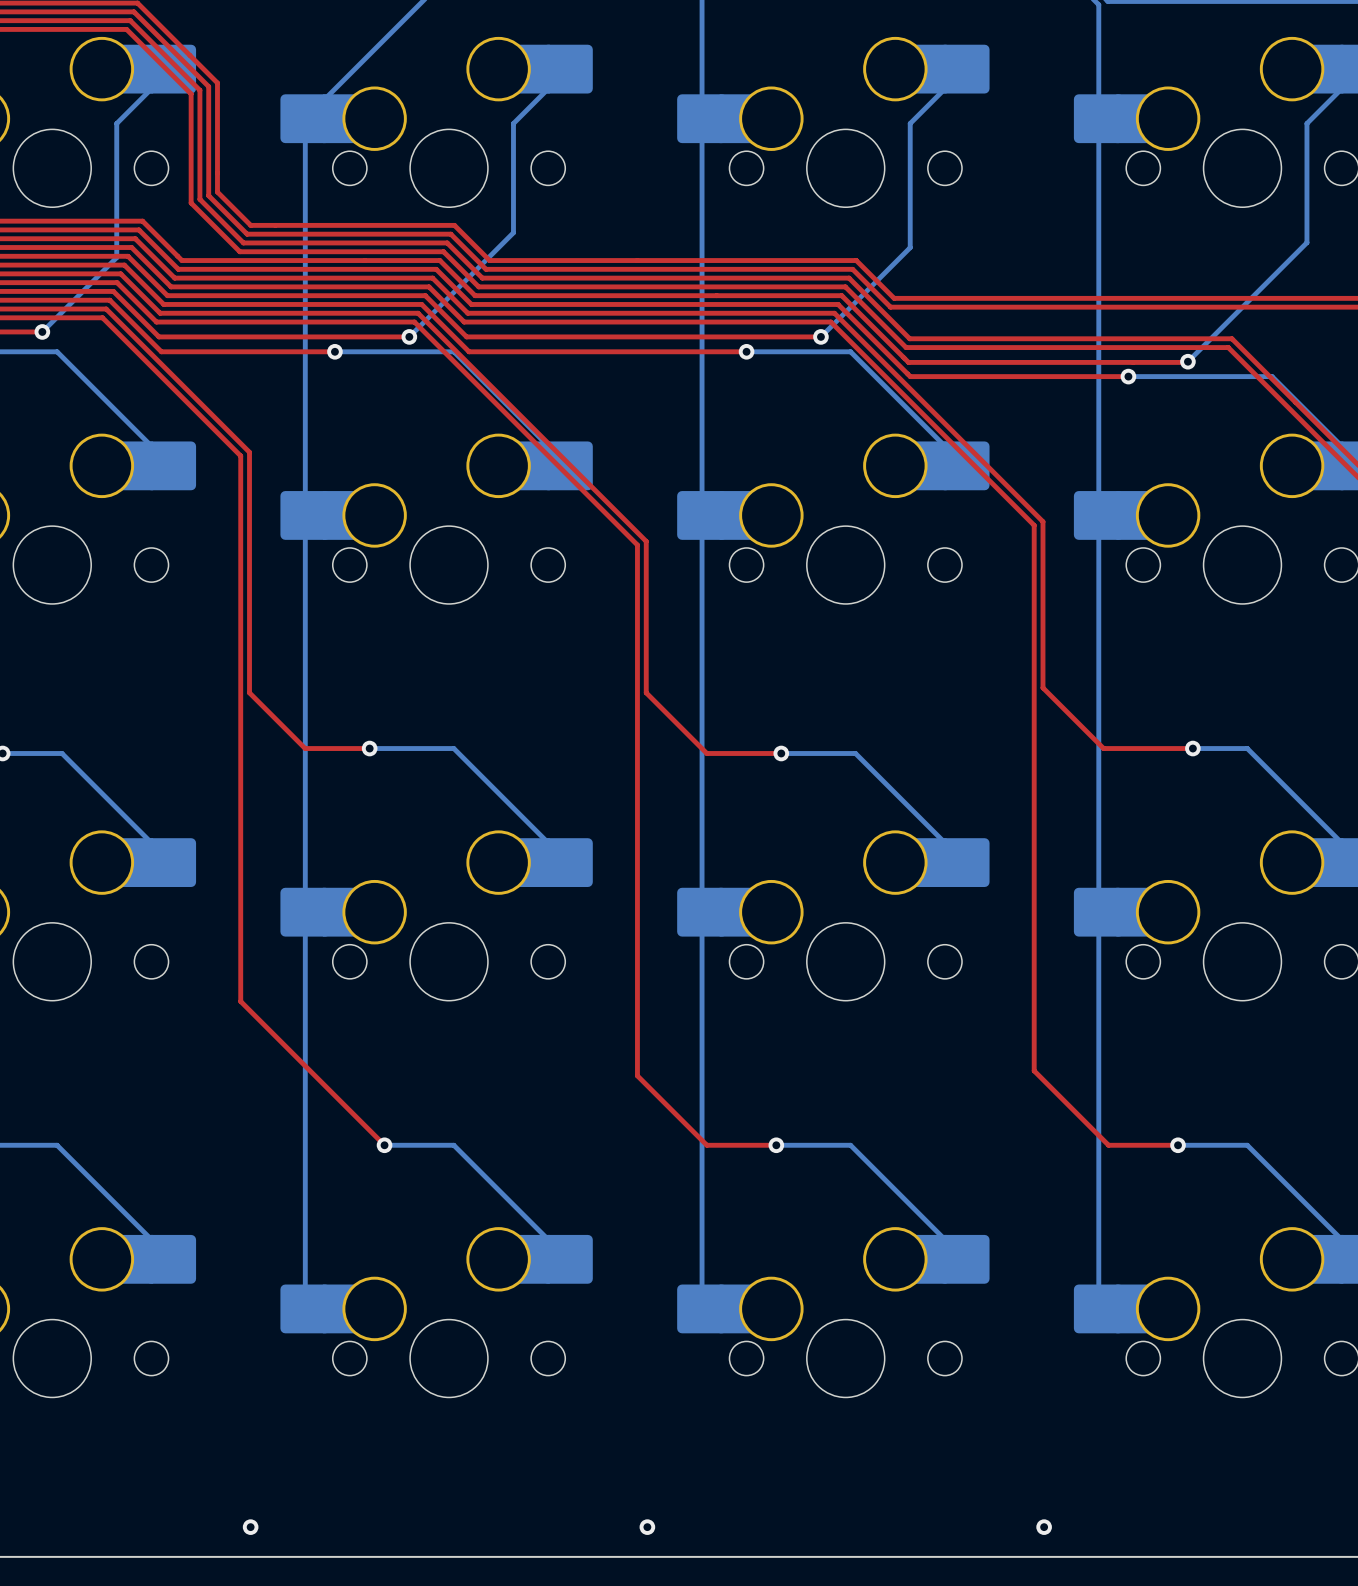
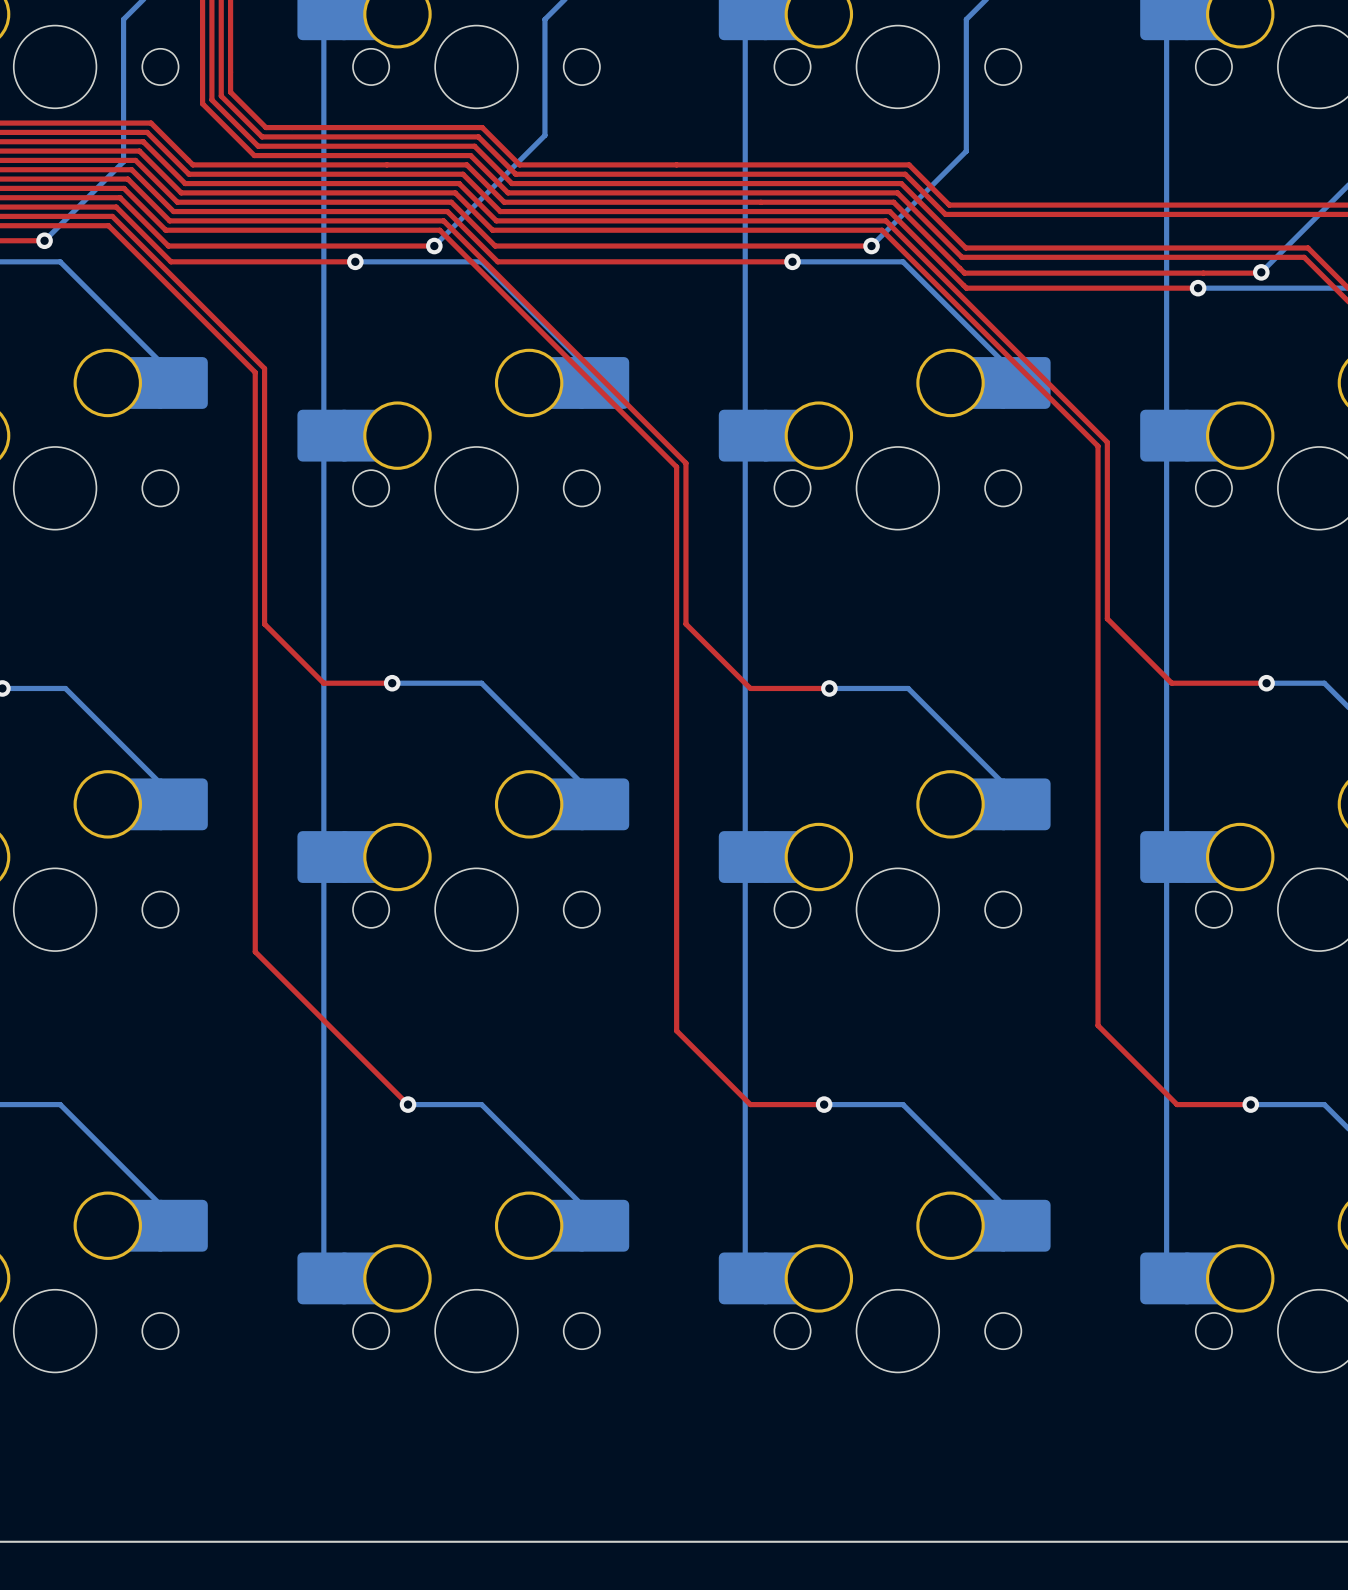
via: (250, 1527) -> none
via: (647, 1527) -> none
via: (1044, 1527) -> none

